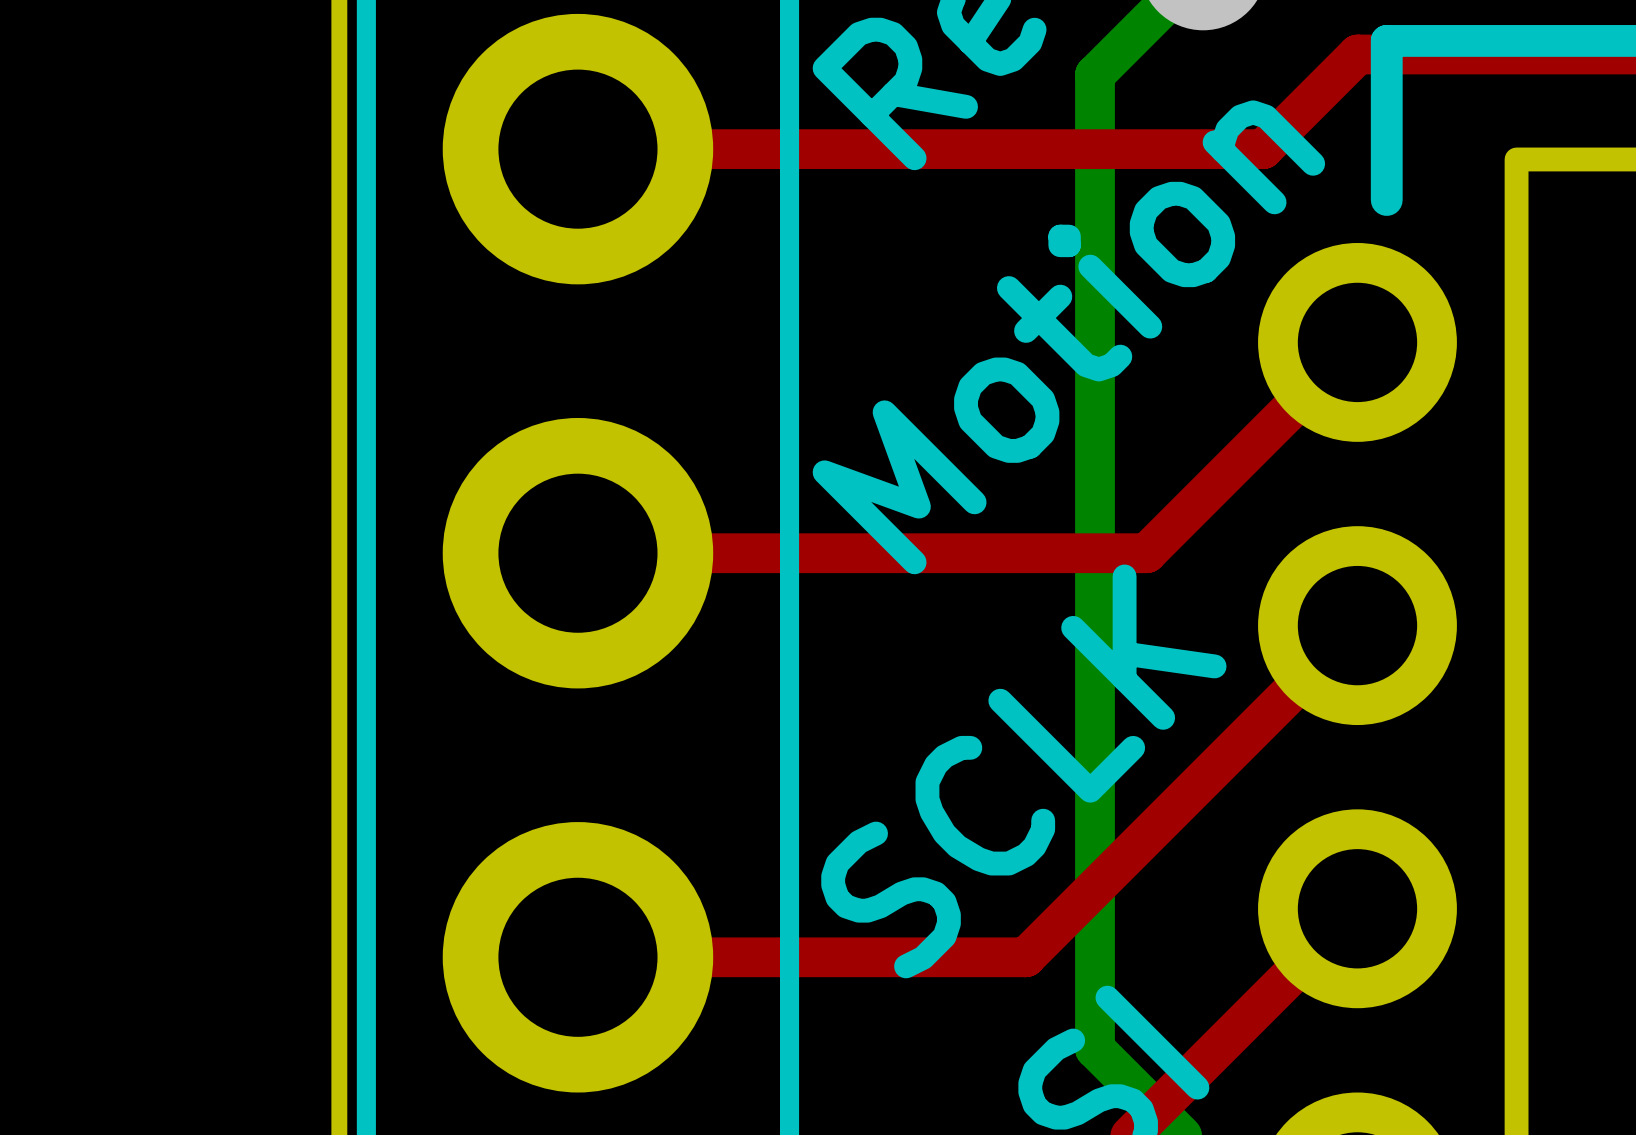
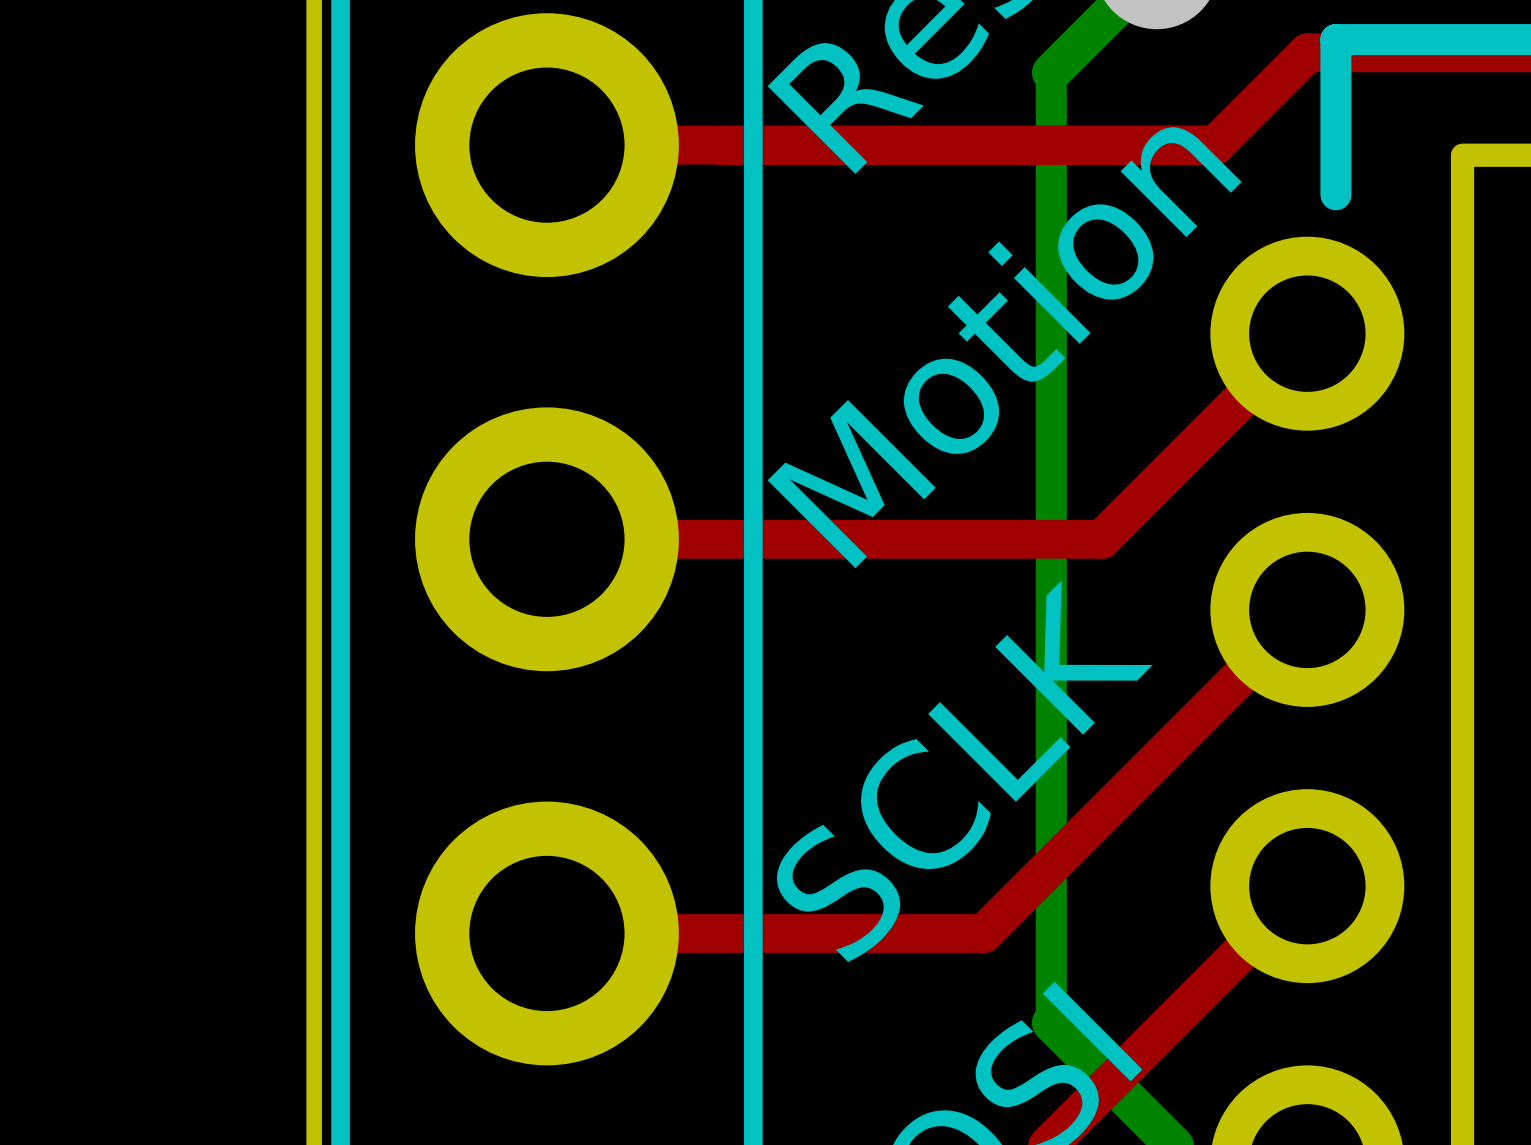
bottom track width: thick (1094, 74) (1094, 1048) -> thin (1051, 72) (1051, 1022)

